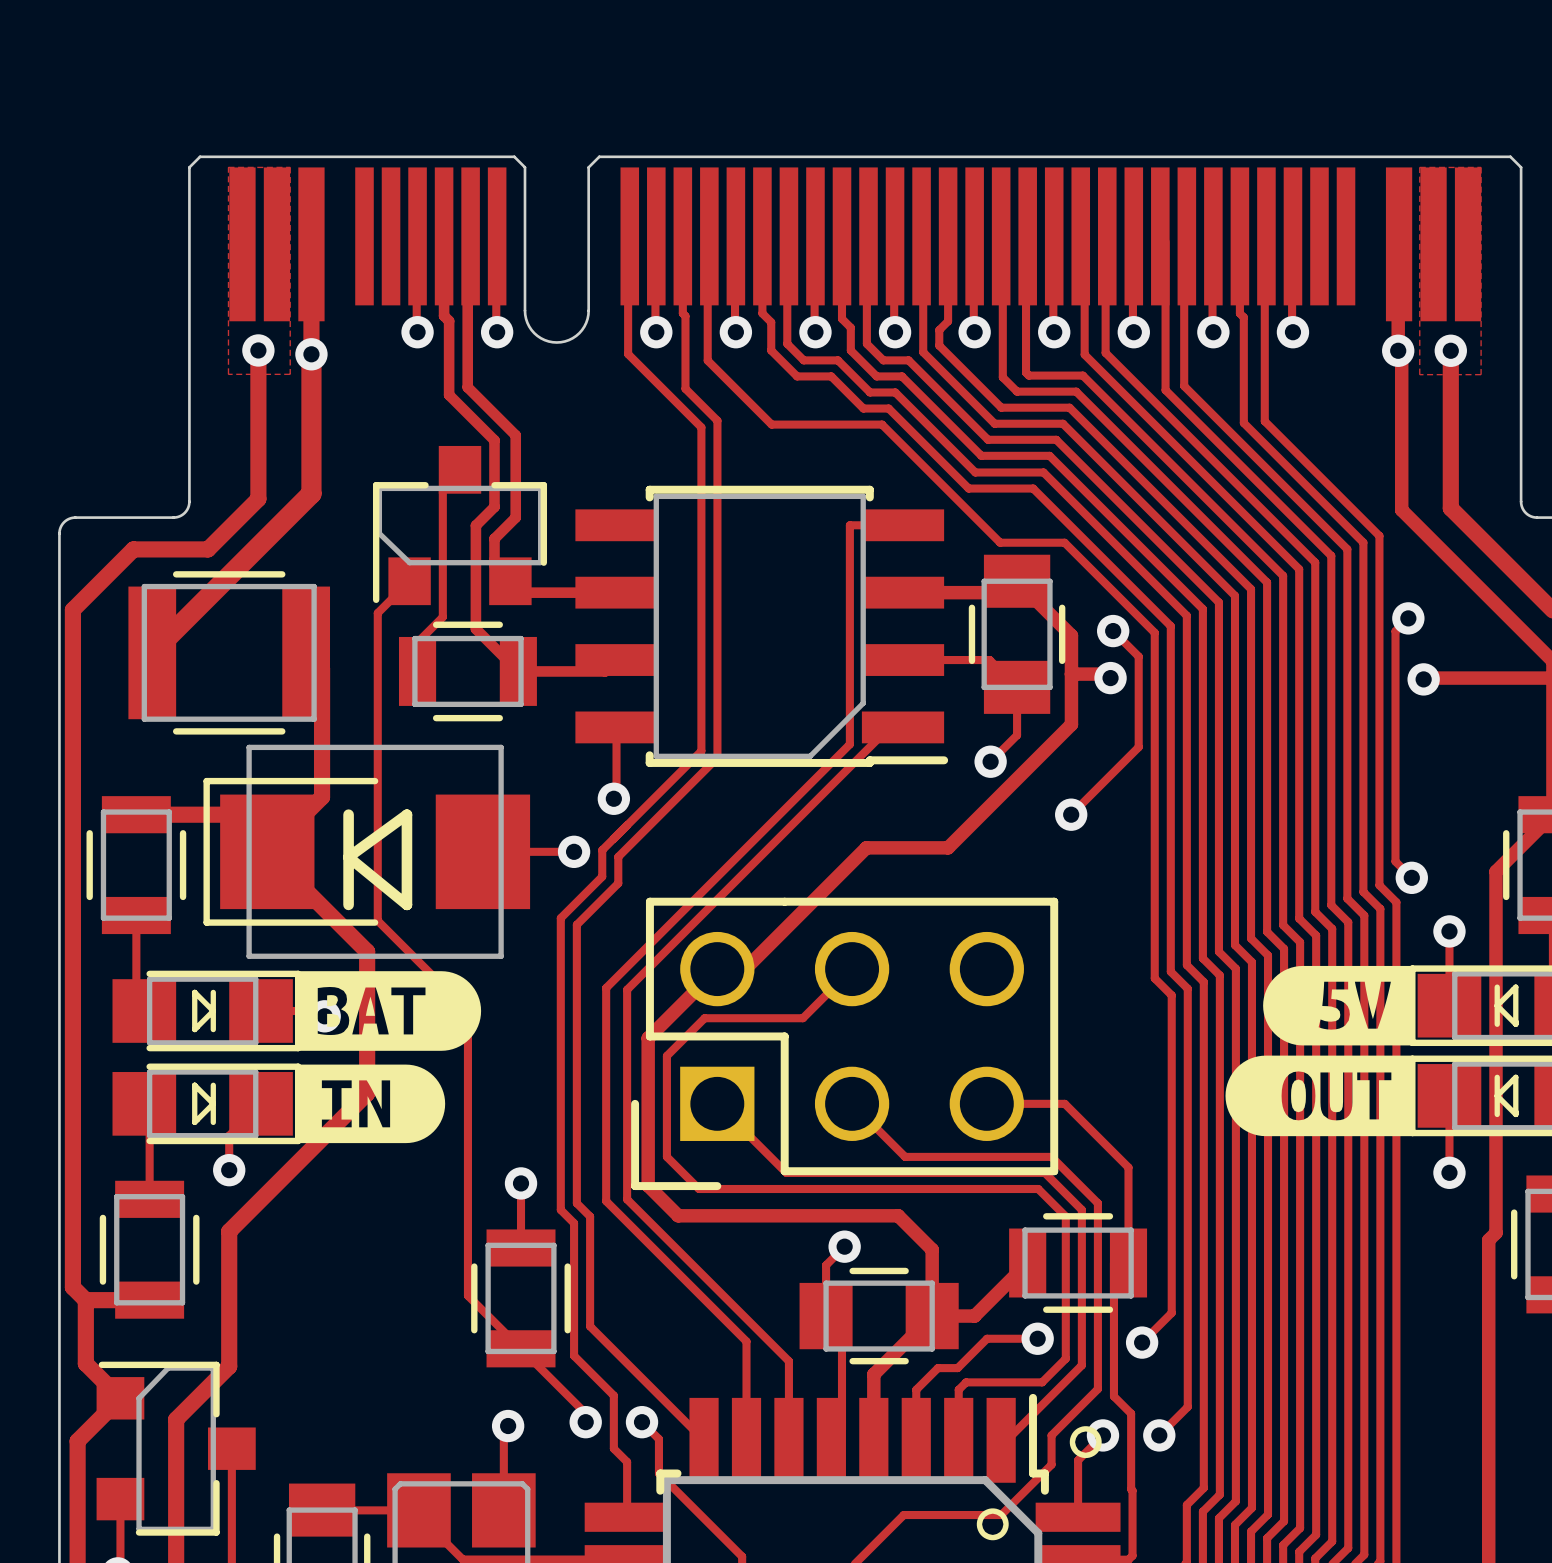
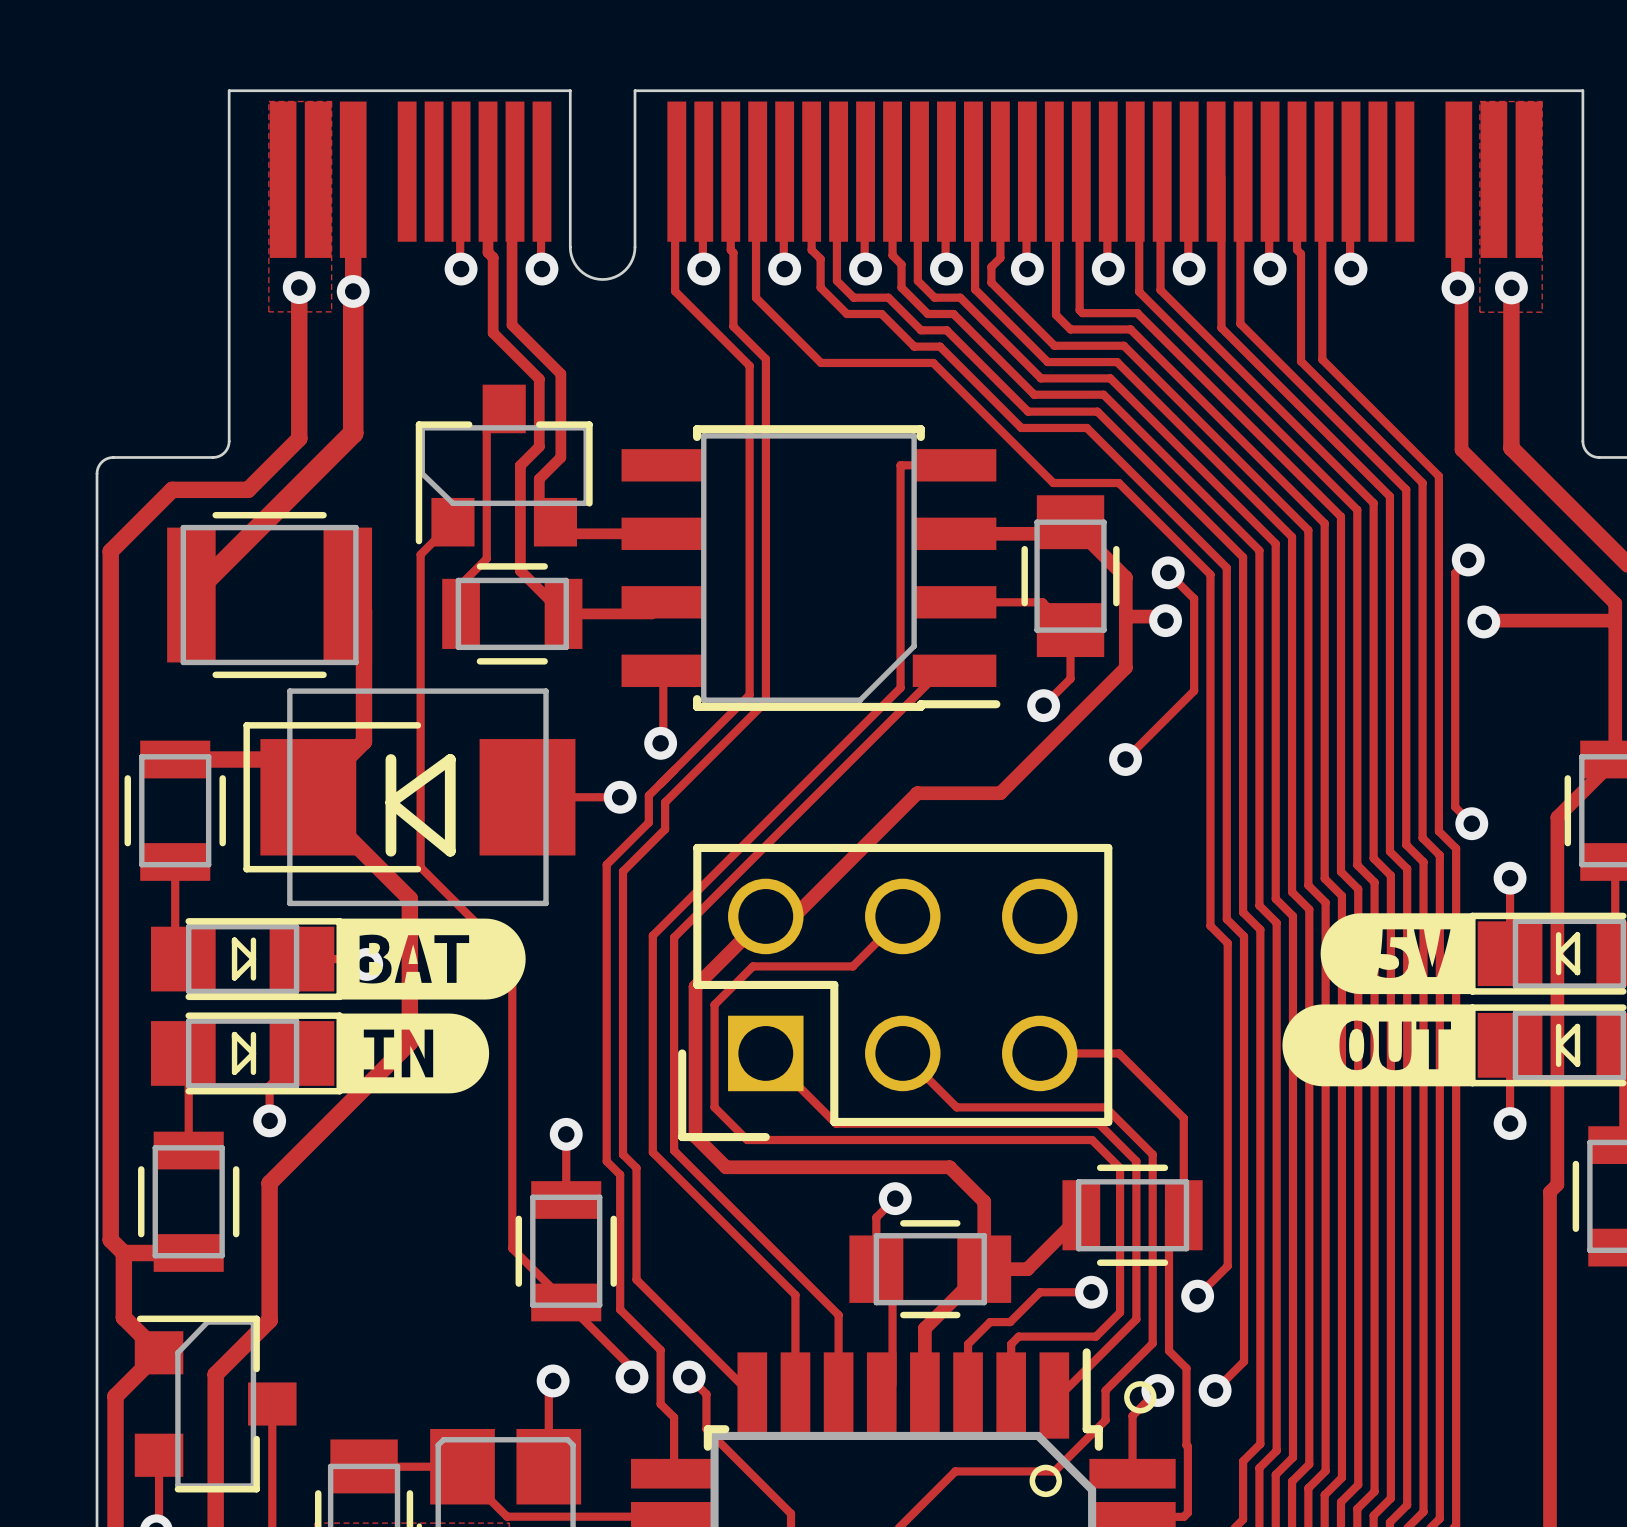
part footprint: [188, 155, 1523, 504] -> [227, 89, 1585, 443]

